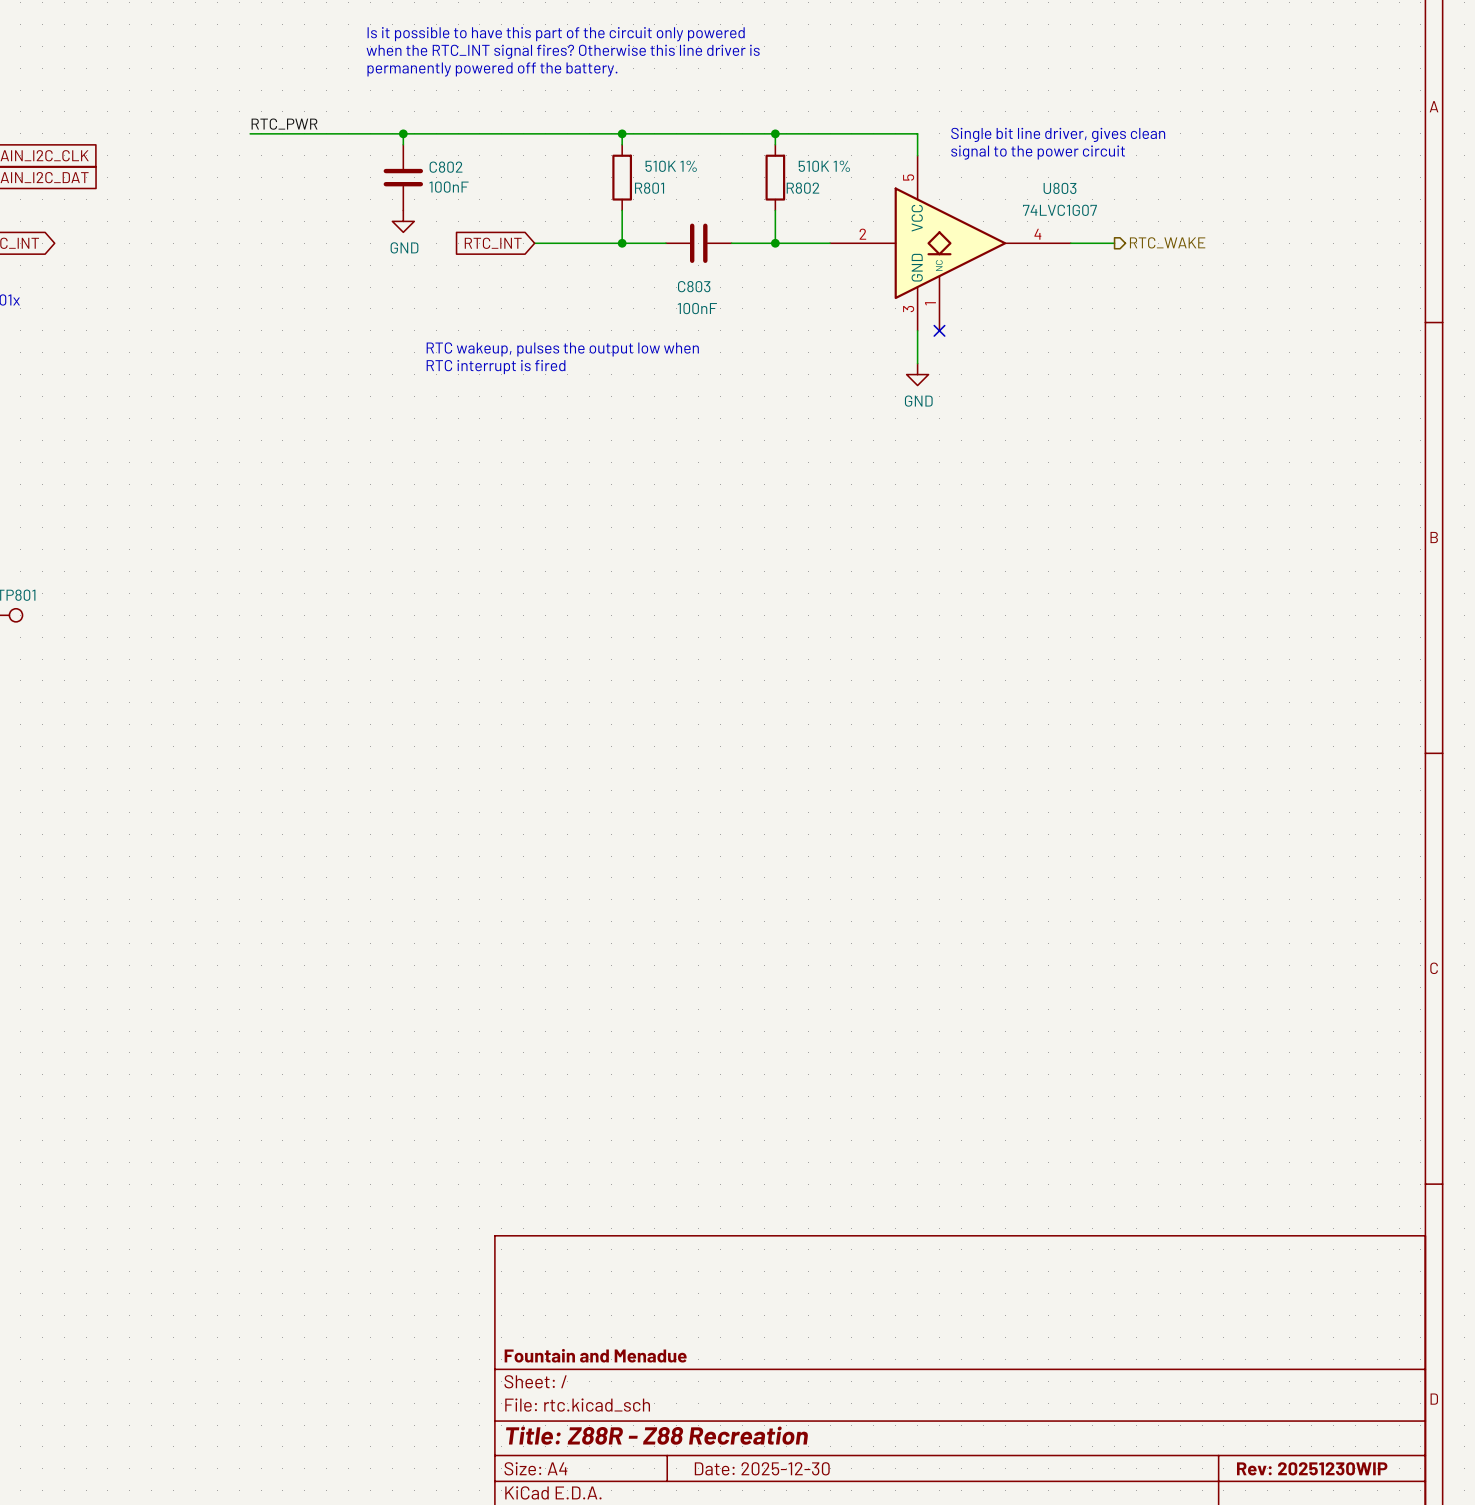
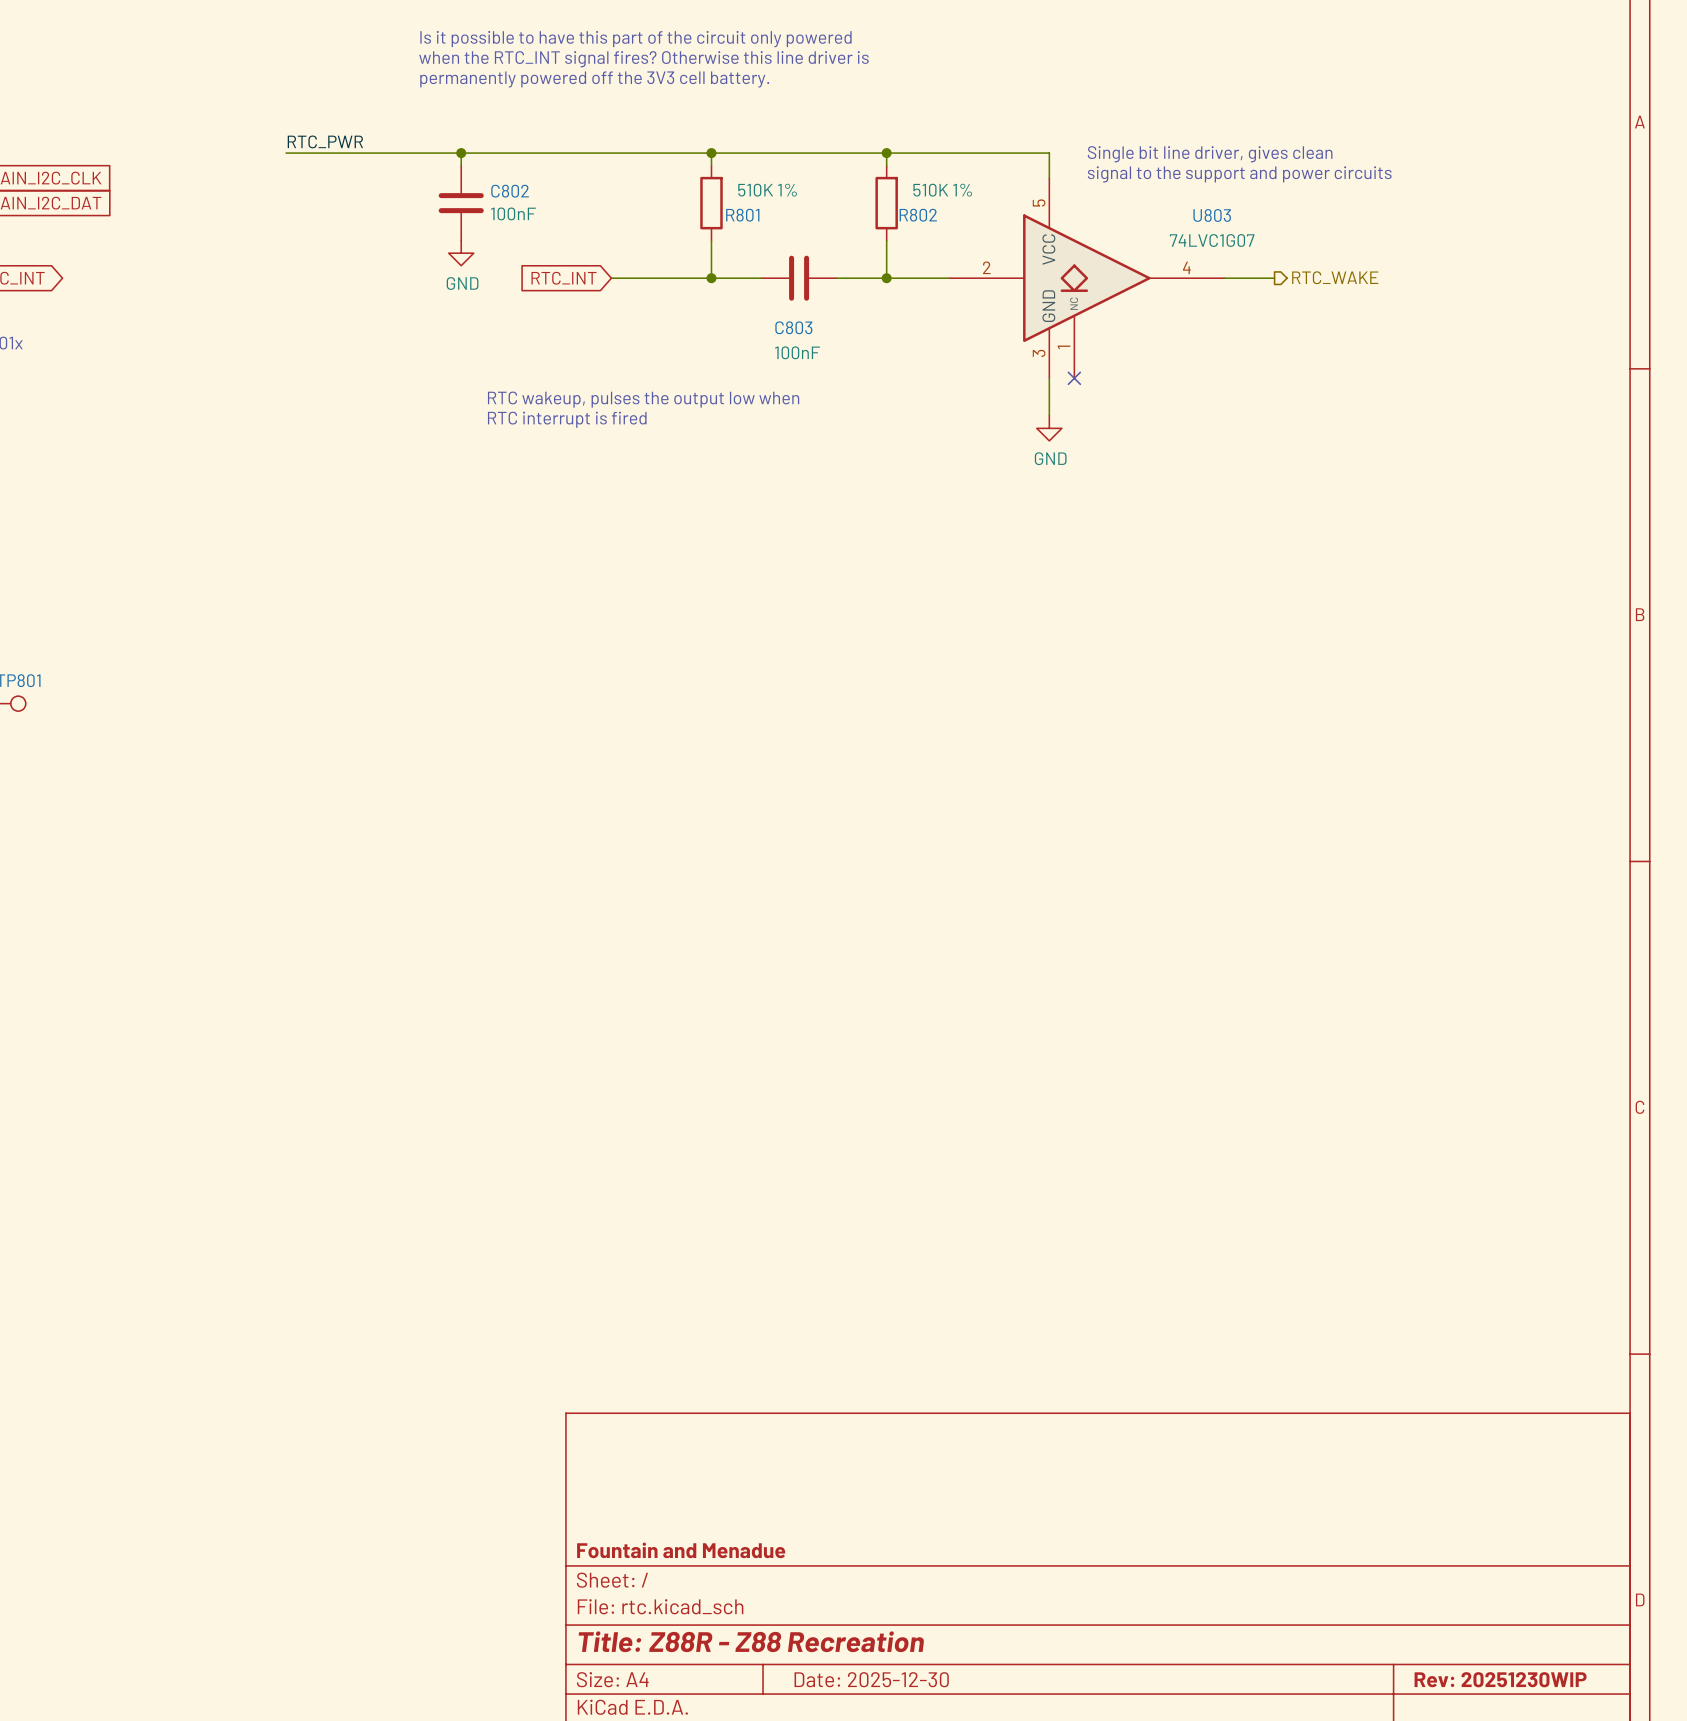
text: permanently powered off the battery. (492, 69) -> permanently powered off the 3V3 cell battery. (594, 79)
text: signal to the power circuit (1038, 152) -> signal to the support and power circuits (1239, 174)

